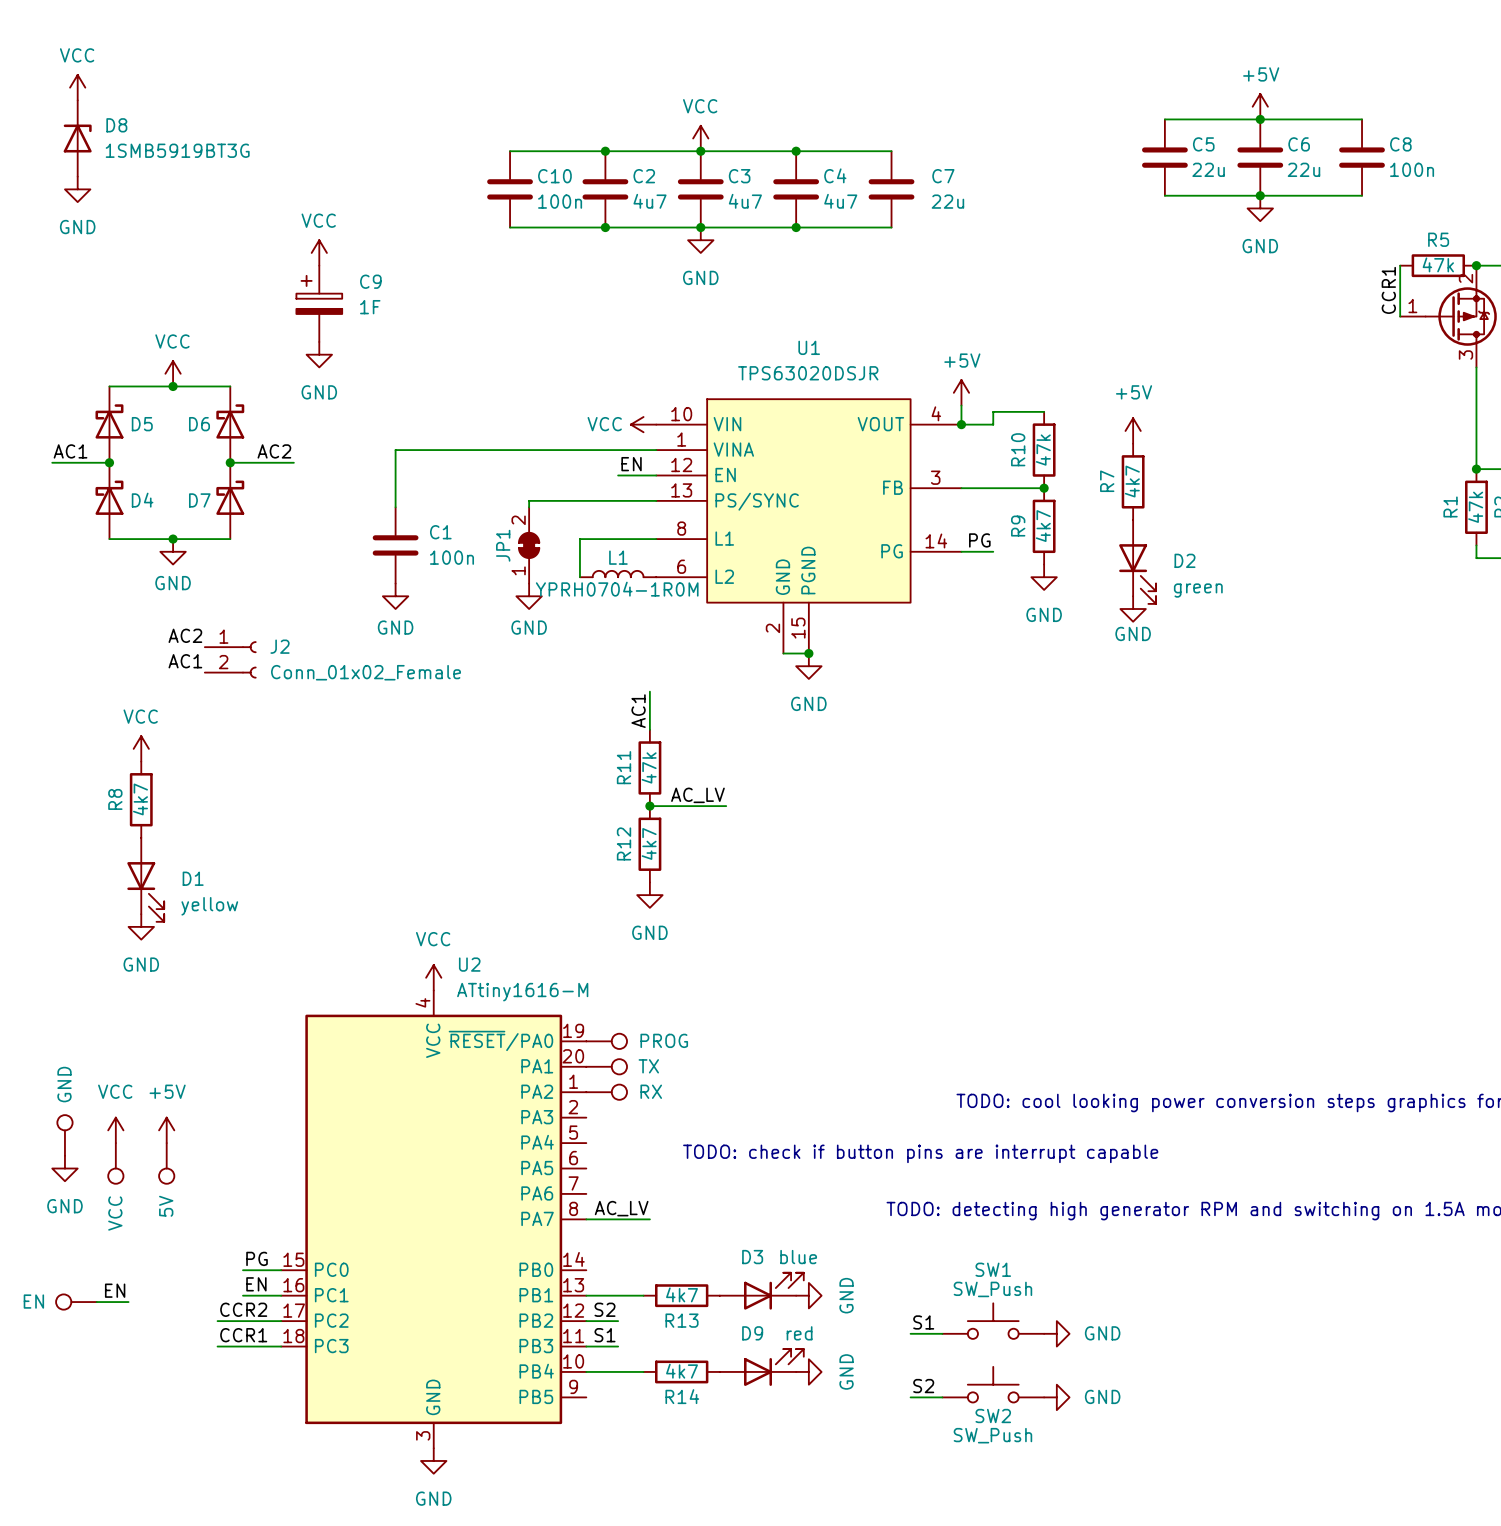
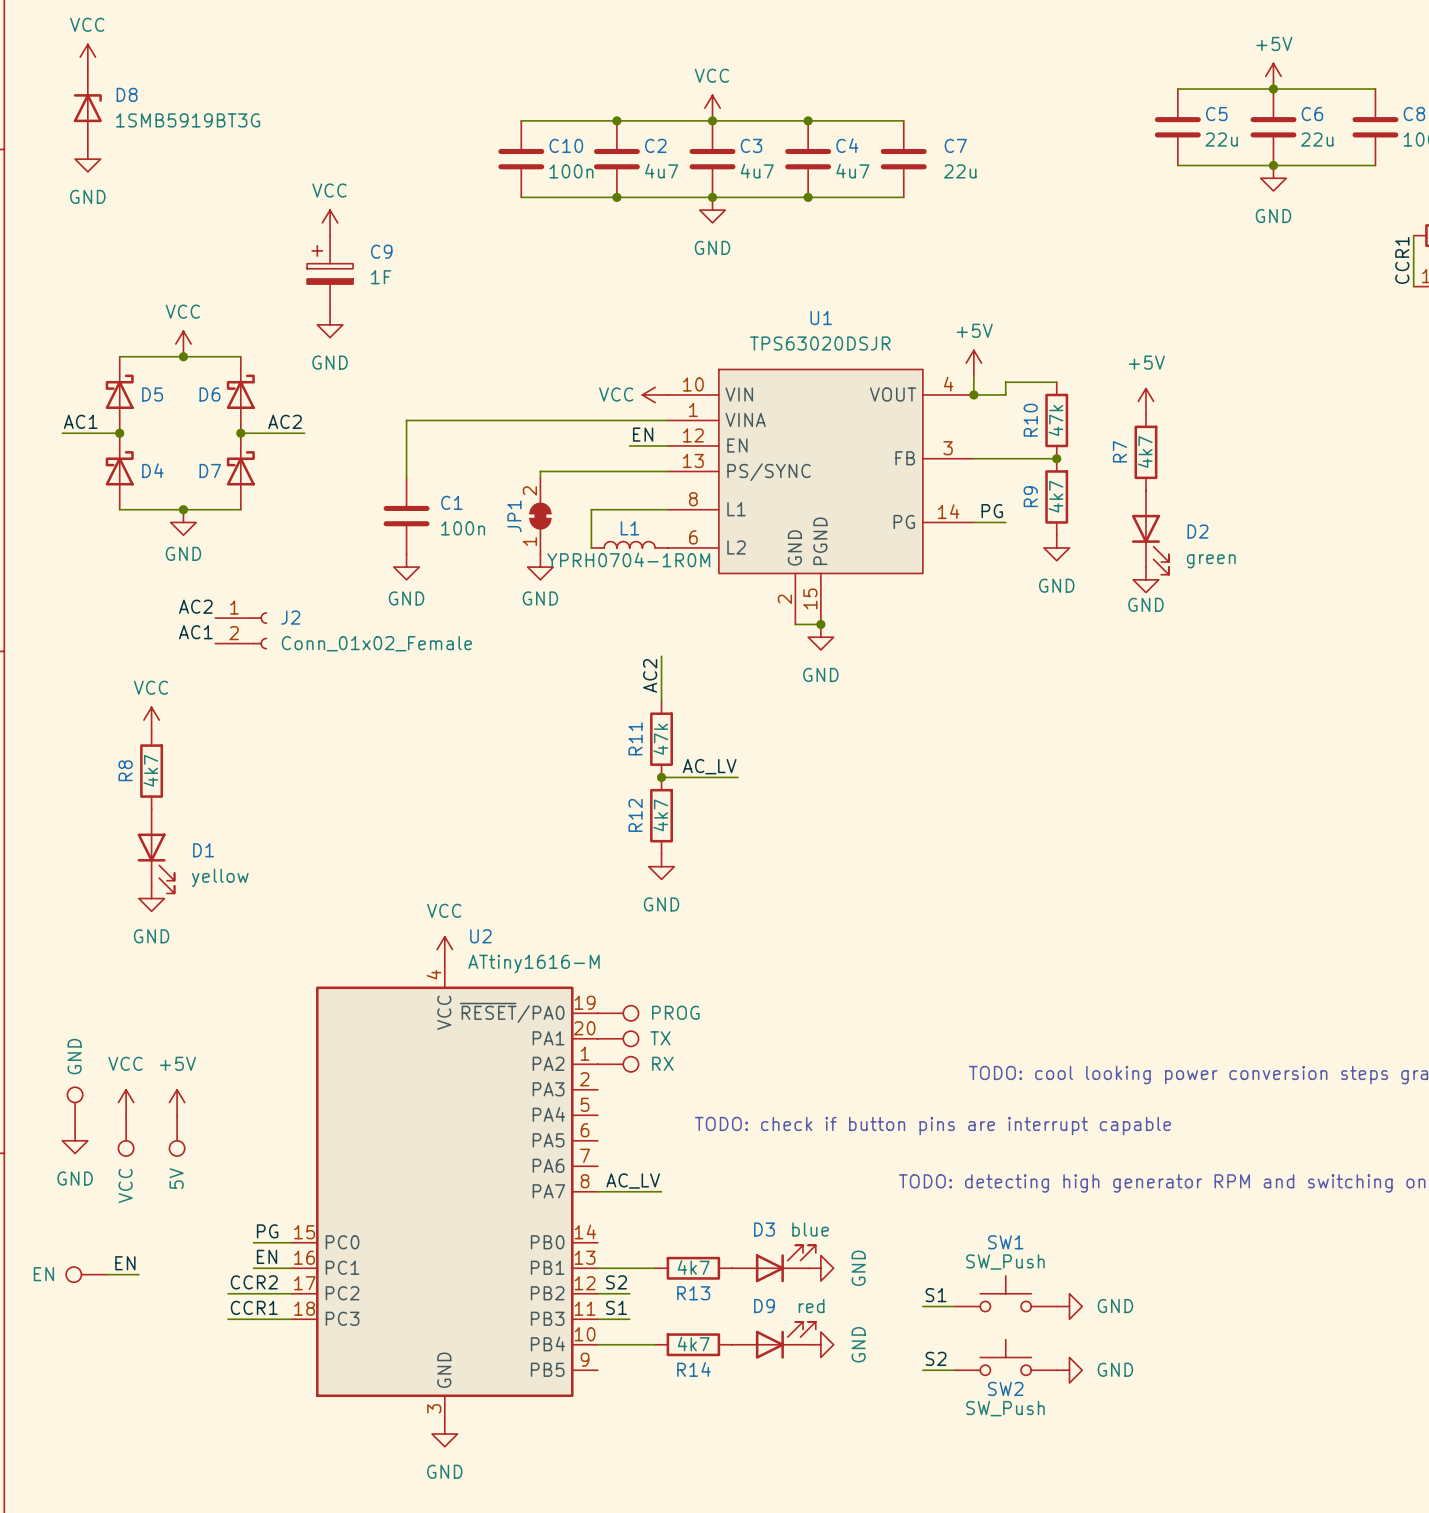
wire: none -> (661, 656) (661, 662)
label: AC1 (638, 711) -> AC2 (650, 675)

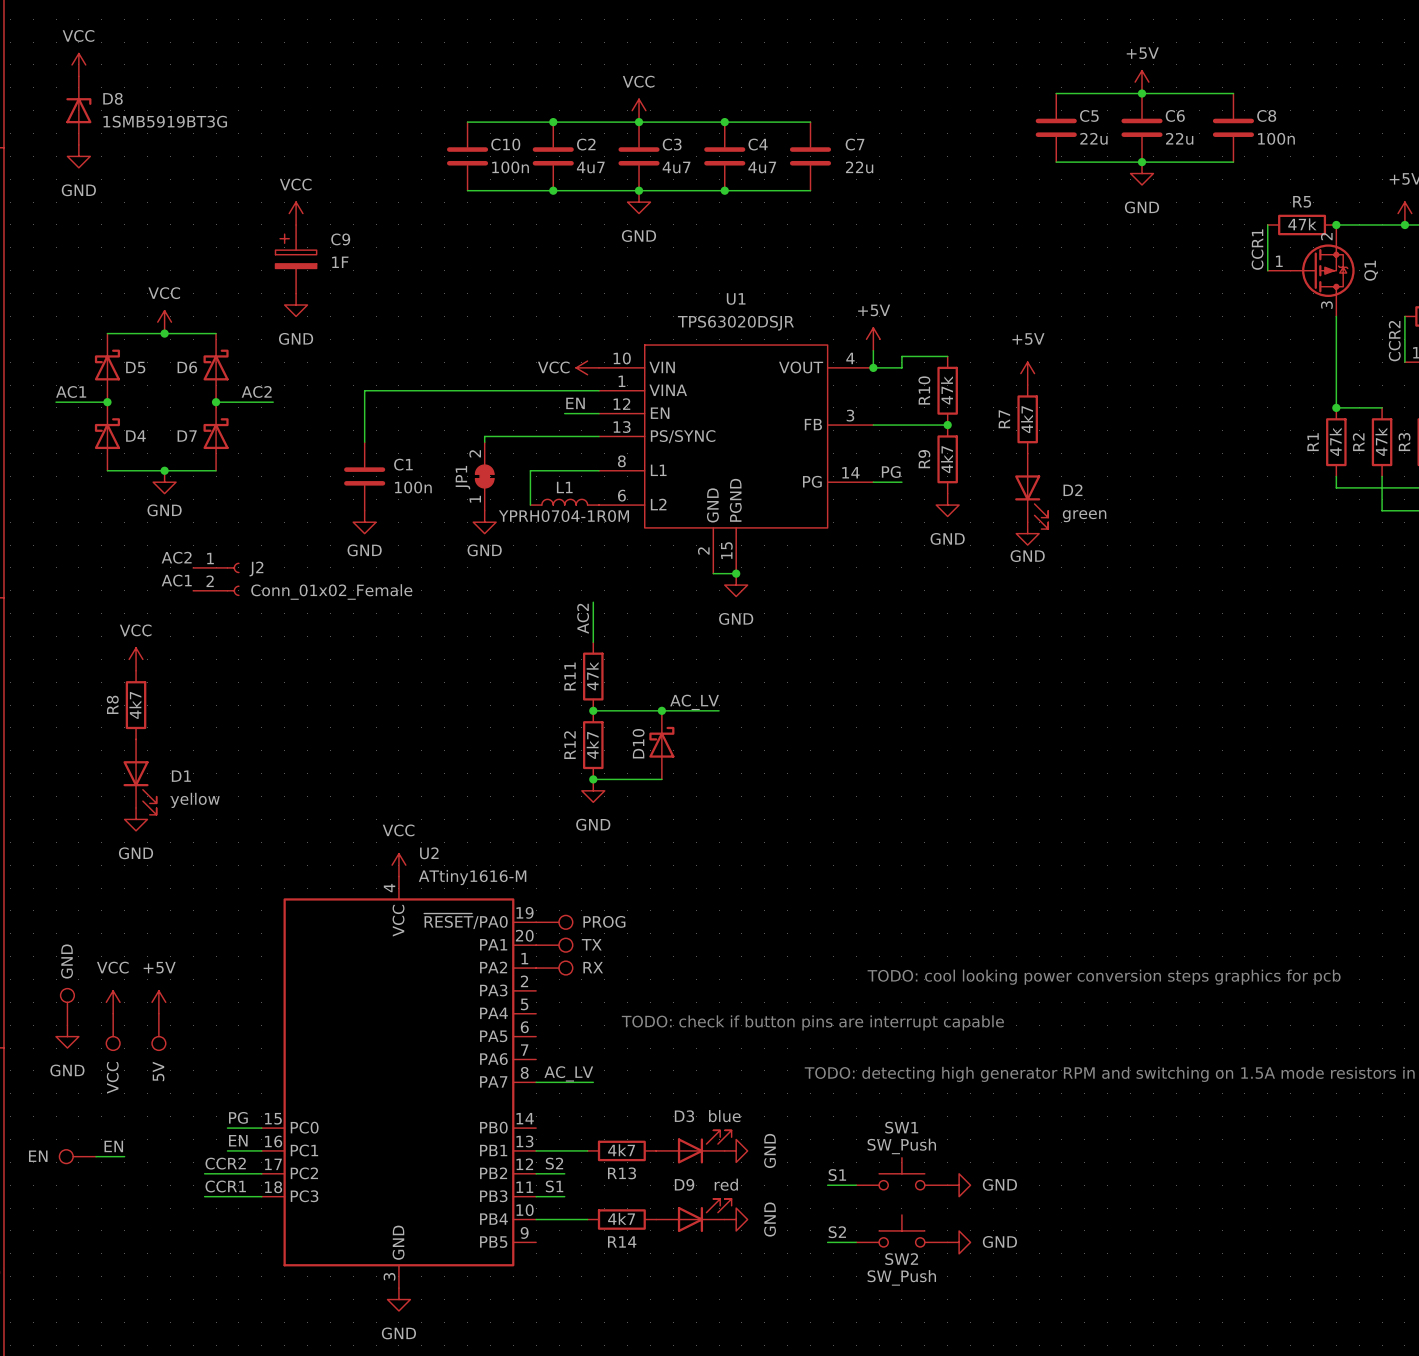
label position: AC_LV (709, 766) -> AC_LV (694, 702)
wire: none -> (661, 710) (719, 710)
junction: none -> (661, 710)
D10: none -> (661, 745)
wire: none -> (593, 779) (661, 779)
junction: none -> (593, 779)

